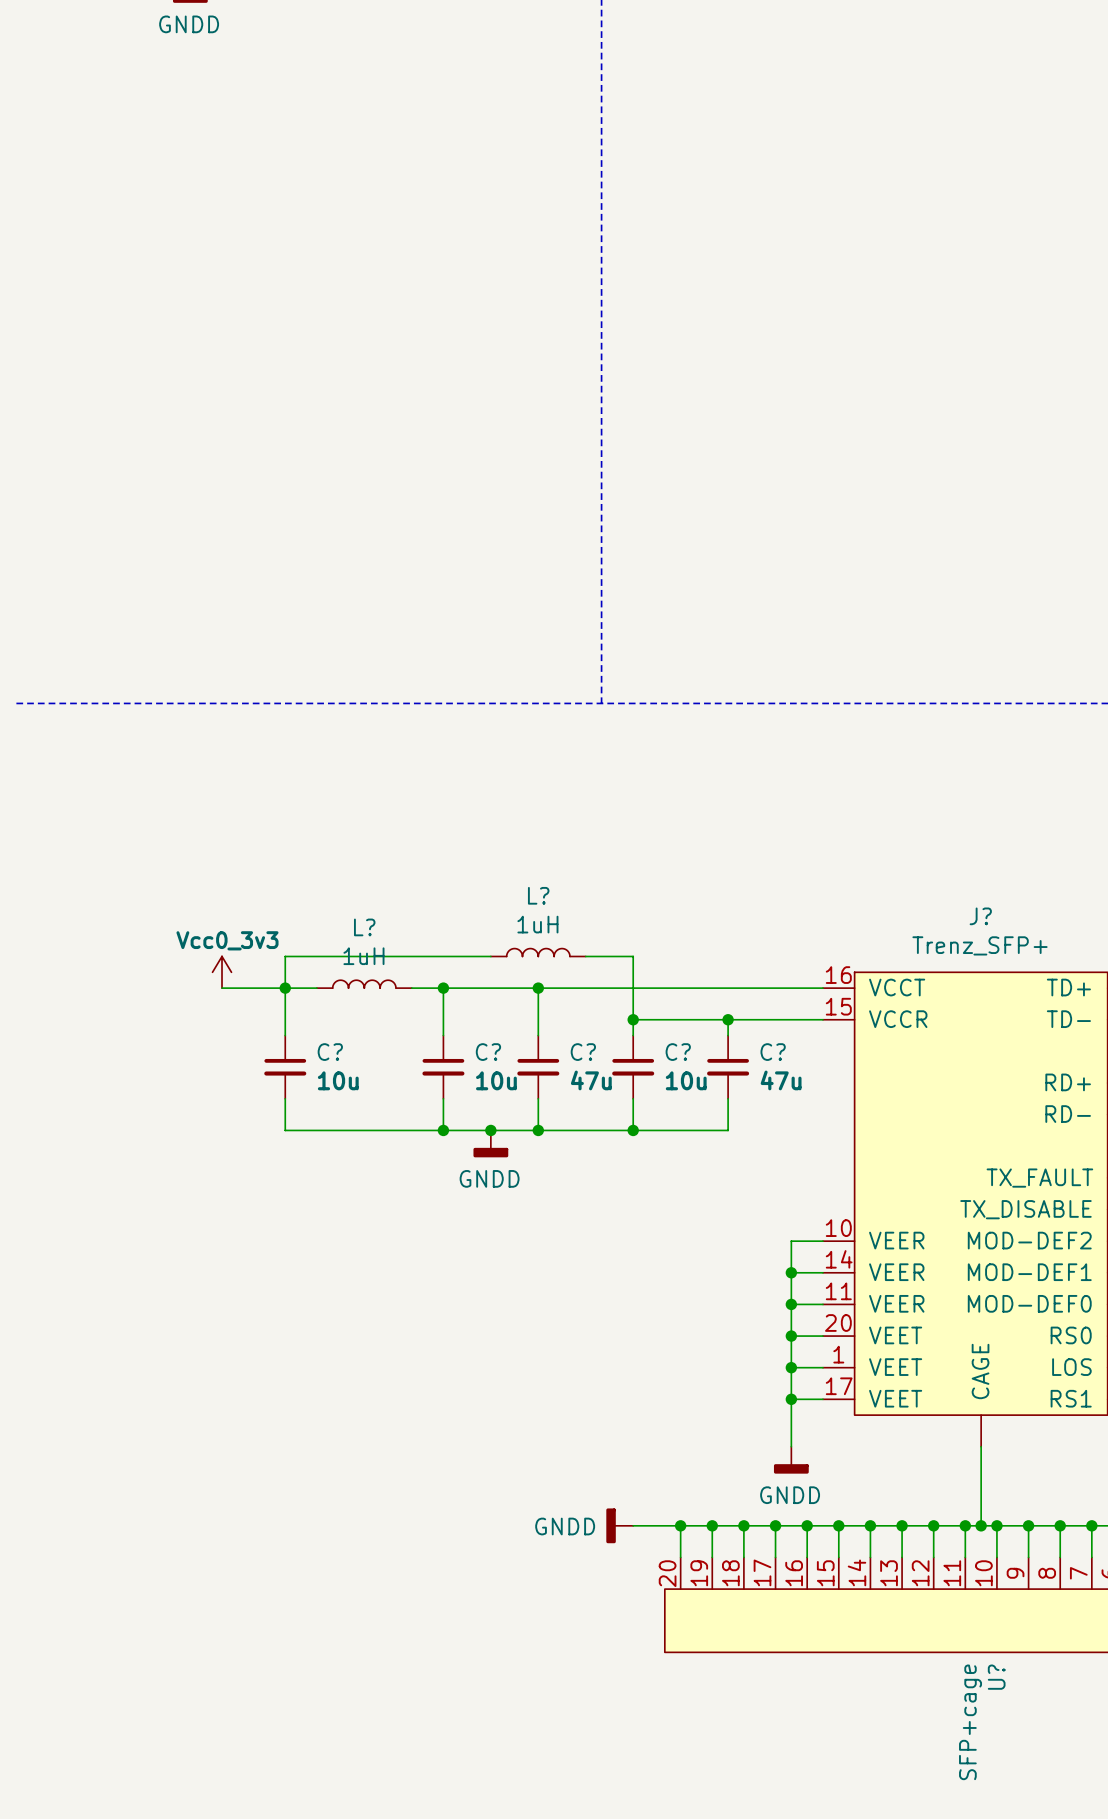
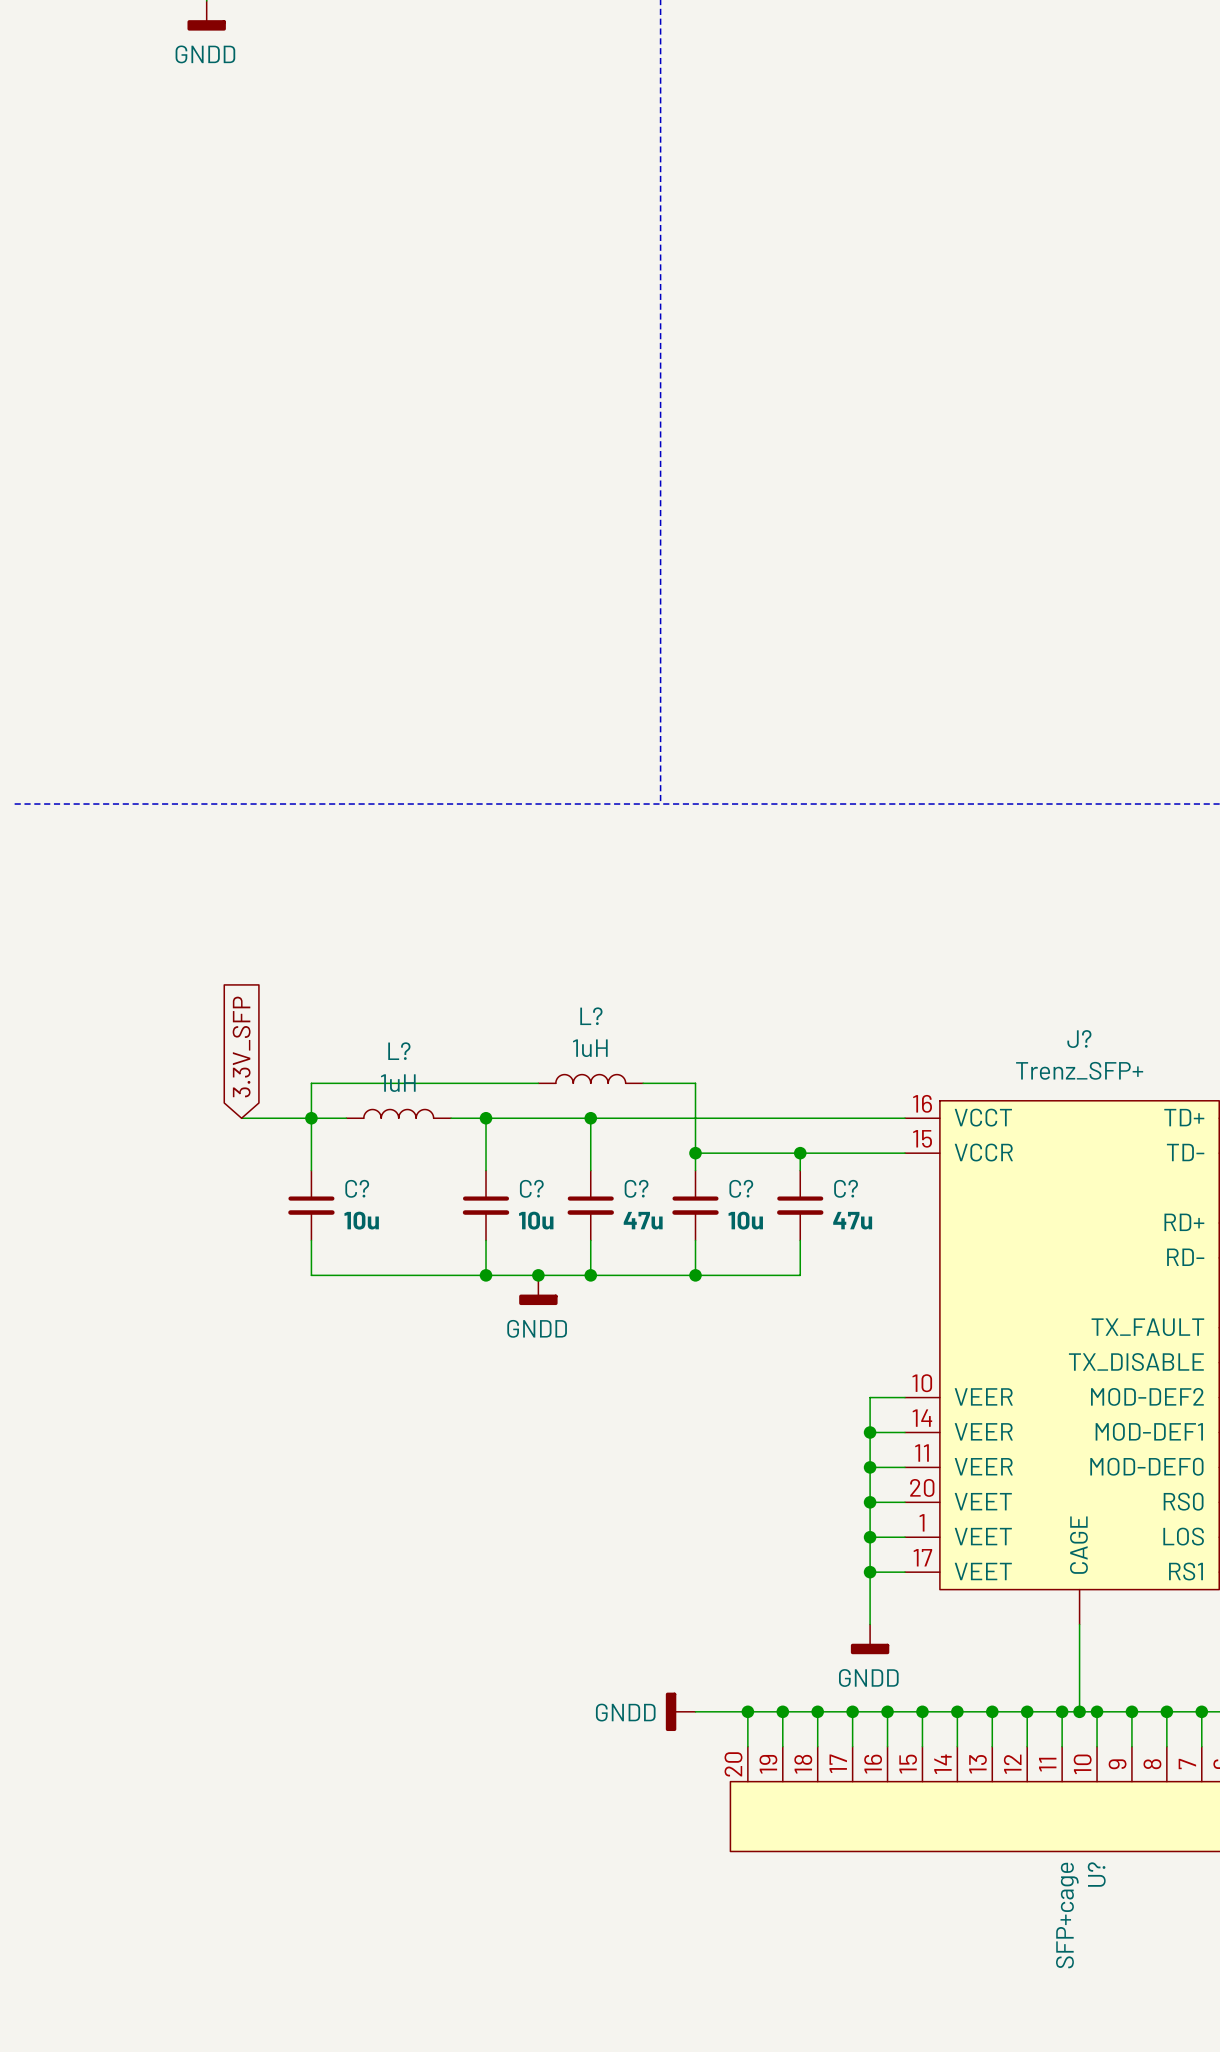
global label: none -> 3.3V_SFP (241, 1047)
part: Vcc0_3v3 (222, 972) -> none

